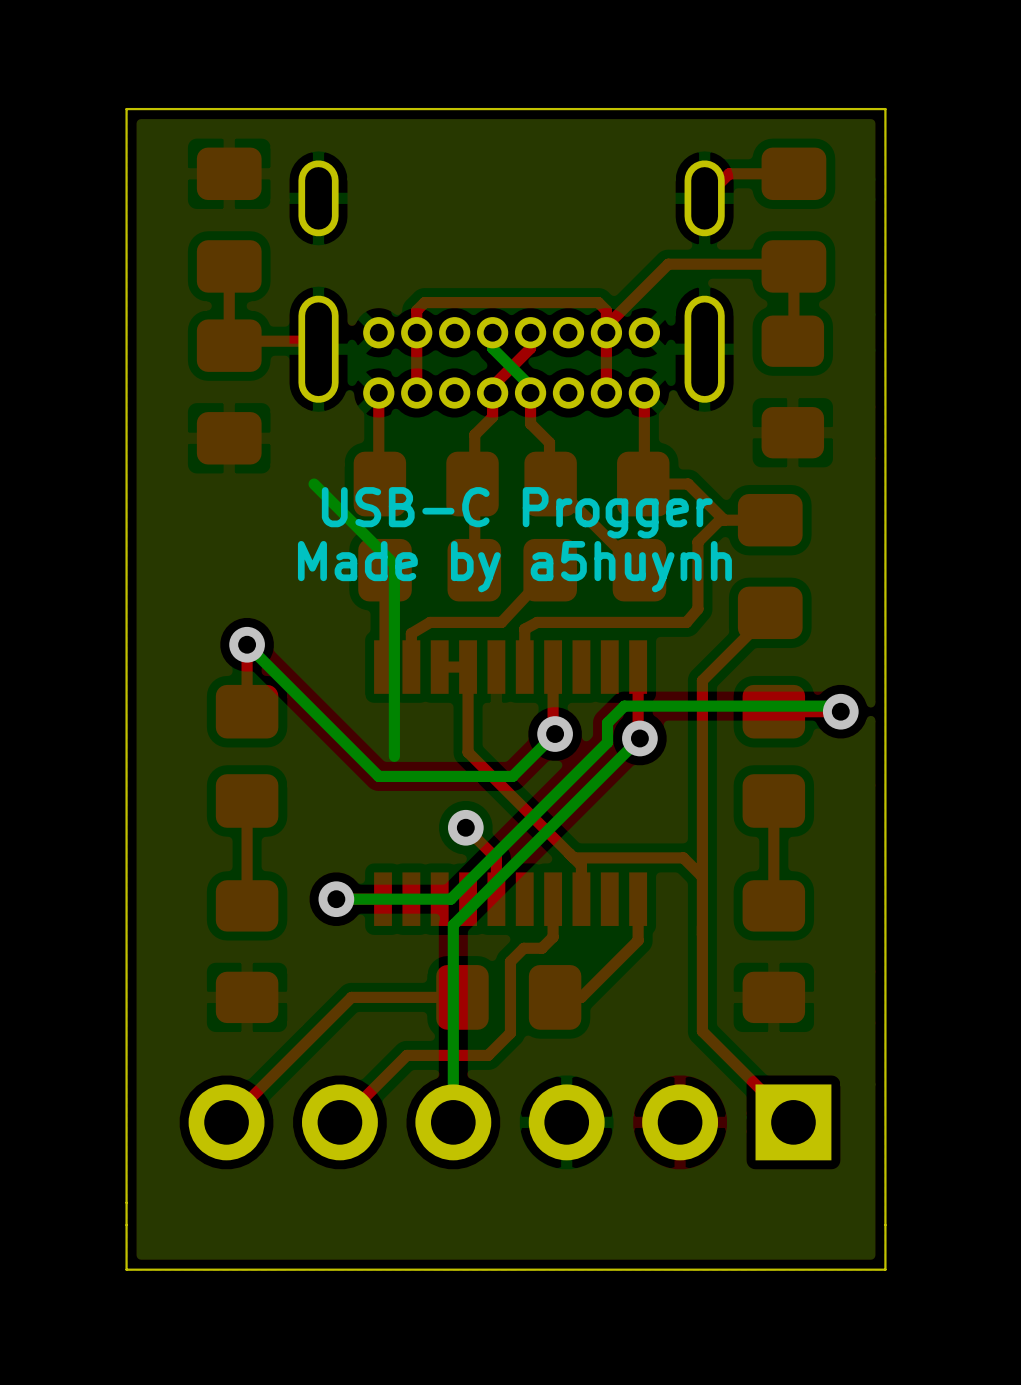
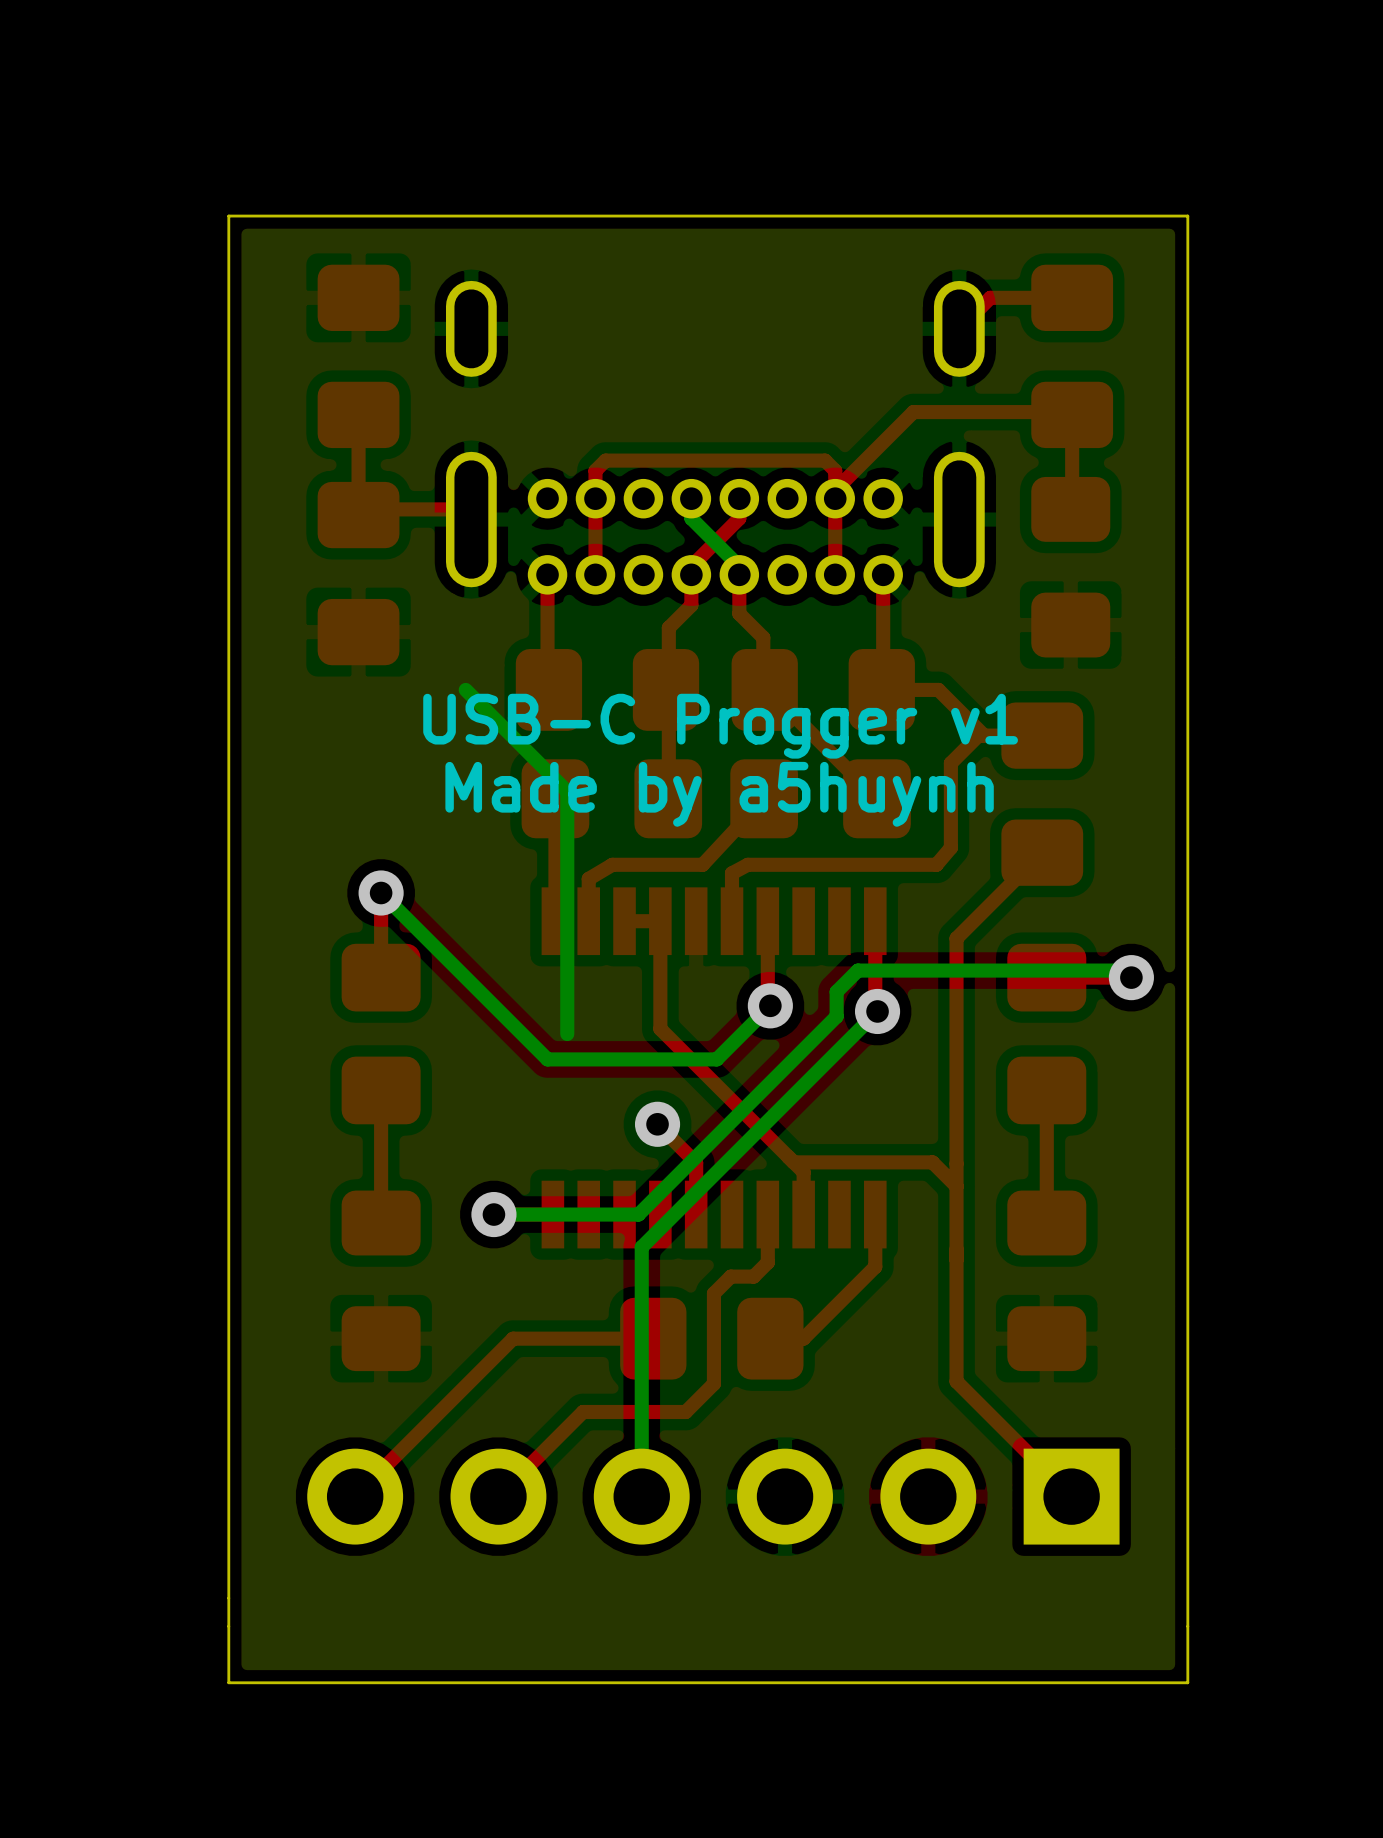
text: USB-C Progger (517, 512) -> USB-C Progger v1 (720, 726)

